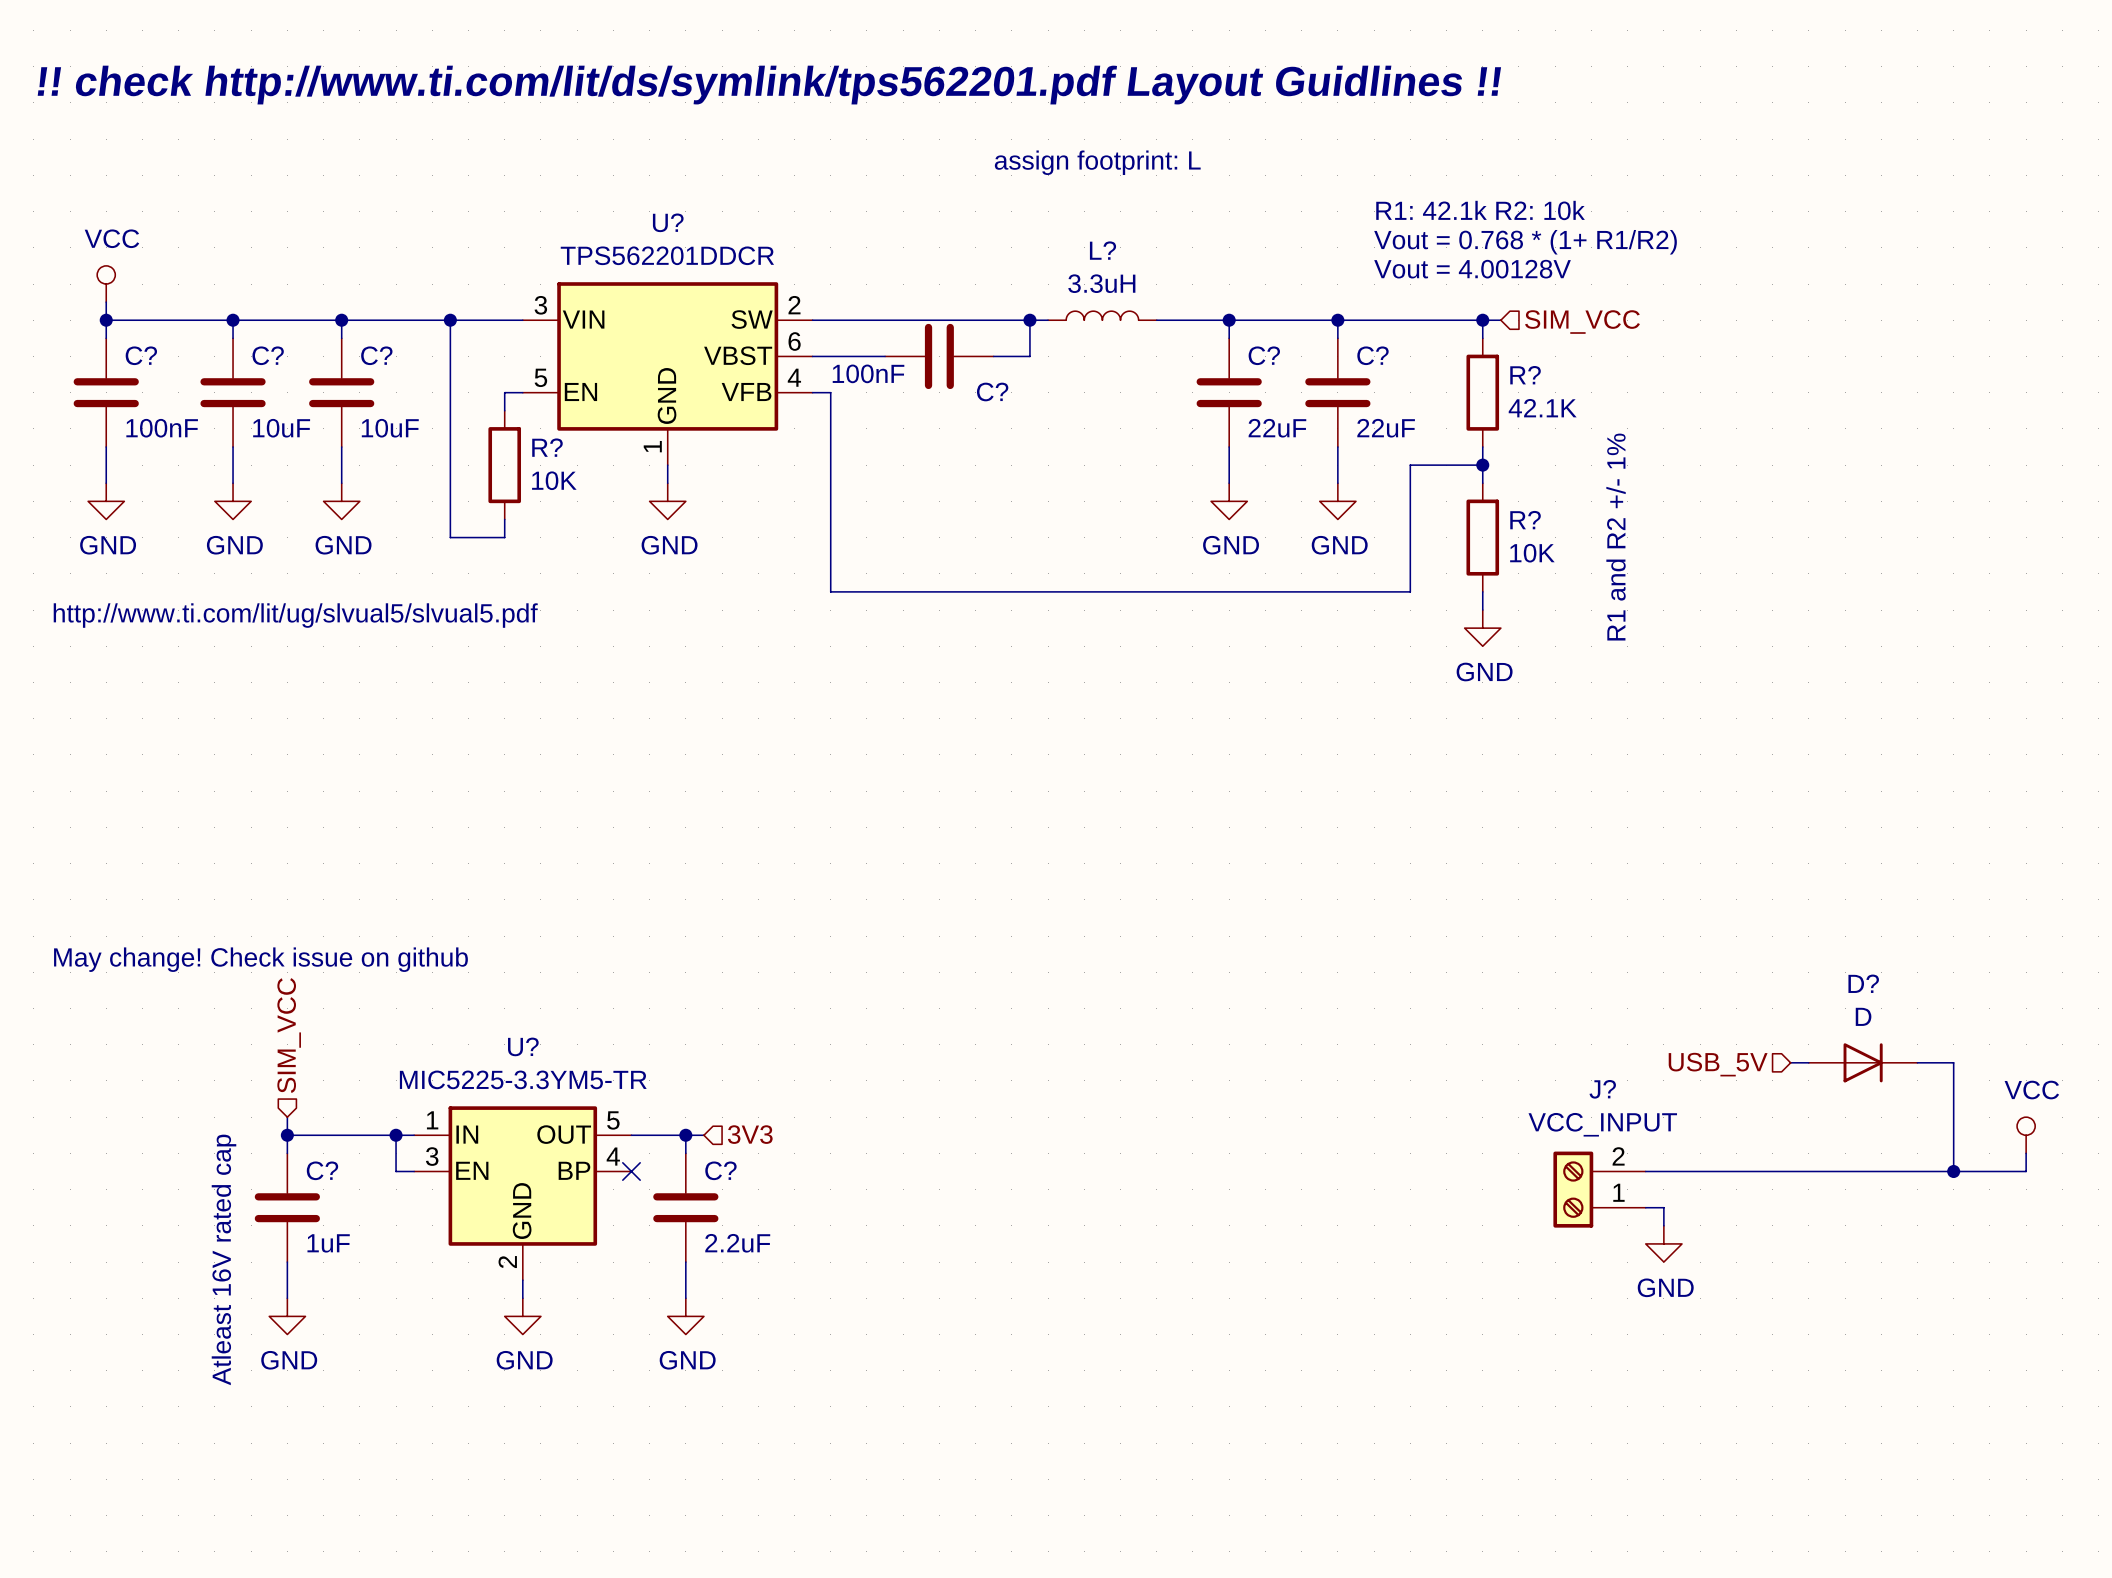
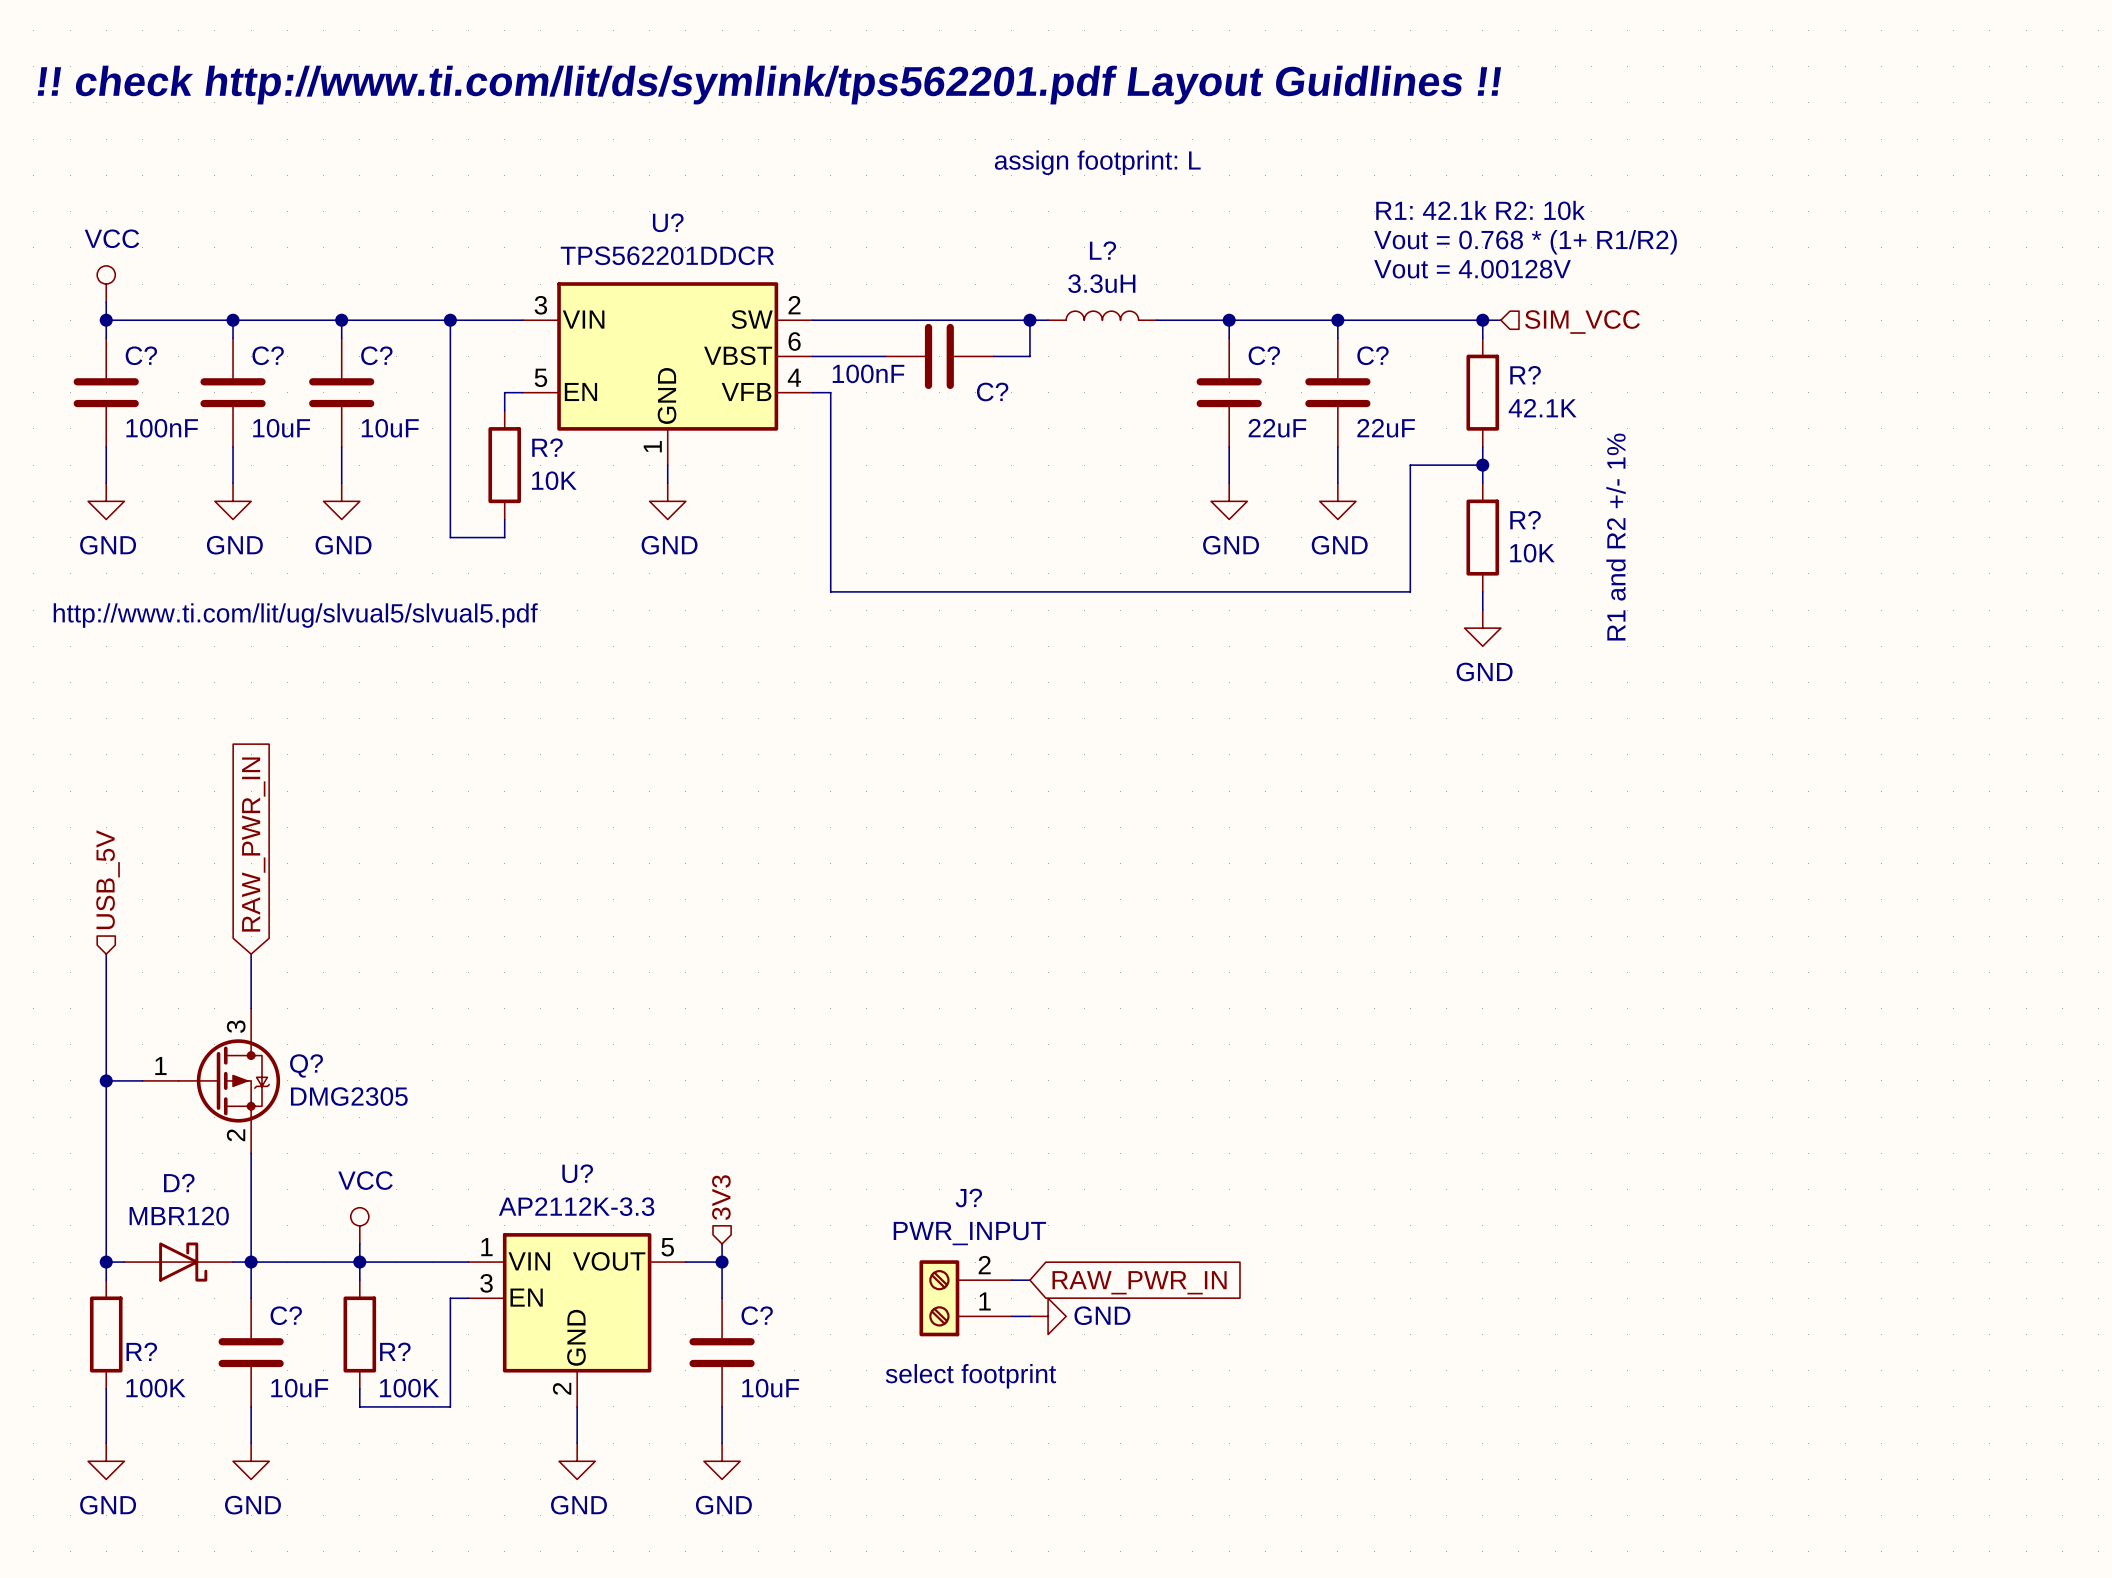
global label: none -> RAW_PWR_IN (253, 844)
hierarchical label: none -> USB_5V (108, 879)
wire: none -> (106, 954) (106, 1280)
wire: none -> (251, 954) (251, 1008)
text: May change! Check issue on github (260, 959) -> none
hierarchical label: SIM_VCC (289, 1035) -> none
wire: (1790, 1062) (1808, 1062) -> none
D?: D (1863, 1062) -> none
wire: (1917, 1062) (1953, 1062) (1953, 1171) -> none
hierarchical label: USB_5V (1718, 1064) -> none
wire: none -> (106, 1080) (142, 1080)
junction: none -> (106, 1080)
Q?: none -> DMG2305 (211, 1080)
wire: (287, 1117) (287, 1153) -> (251, 1406) (251, 1443)
hierarchical label rotation: 0° (750, 1134) -> 90° counterclockwise (721, 1197)
hierarchical label position: 3V3 (750, 1134) -> 3V3 (721, 1197)
wire: (287, 1135) (414, 1135) -> none
junction: (287, 1135) -> none
wire: (396, 1135) (396, 1171) (414, 1171) -> none
junction: (396, 1135) -> none
wire: (631, 1135) (703, 1135) -> none
wire: (685, 1135) (685, 1153) -> none
junction: (685, 1135) -> none
power symbol: VCC (2026, 1135) -> none
wire: none -> (251, 1153) (251, 1298)
wire: (2026, 1153) (2026, 1171) (1645, 1171) -> none
no-connect mark: (631, 1171) -> none
junction: (1953, 1171) -> none
J?: VCC_INPUT (1599, 1189) -> none
U?: MIC5225-3.3YM5-TR (522, 1193) -> none
C?: 1uF (287, 1207) -> none
C?: 2.2uF (685, 1207) -> none
wire: (1645, 1207) (1663, 1207) (1663, 1225) -> none
power symbol: none -> VCC (359, 1225)
wire: none -> (722, 1243) (722, 1298)
power symbol: GND (1663, 1243) -> none
text: Atleast 16V rated cap (224, 1259) -> none
wire: none -> (106, 1262) (124, 1262)
junction: none -> (106, 1262)
D?: none -> MBR120 (178, 1262)
wire: none -> (233, 1262) (468, 1262)
junction: none -> (251, 1262)
wire: (287, 1262) (287, 1298) -> (359, 1243) (359, 1280)
junction: none -> (359, 1262)
wire: (685, 1262) (685, 1298) -> (685, 1262) (722, 1262)
junction: none -> (722, 1262)
wire: none -> (1011, 1280) (1029, 1280)
global label: none -> RAW_PWR_IN (1139, 1282)
wire: none -> (468, 1298) (450, 1298) (450, 1406) (359, 1406) (359, 1388)
J?: none -> PWR_INPUT (965, 1298)
power symbol: GND (287, 1316) -> none
power symbol: GND (522, 1316) -> none
power symbol: GND (685, 1316) -> none
wire: none -> (1011, 1316) (1029, 1316)
power symbol: none -> GND (1048, 1316)
U?: none -> AP2112K-3.3 (577, 1320)
R?: none -> 100K (106, 1334)
R?: none -> 100K (359, 1334)
C?: none -> 10uF (251, 1352)
C?: none -> 10uF (722, 1352)
text: none -> select footprint (970, 1376)
wire: none -> (106, 1388) (106, 1443)
wire: none -> (577, 1406) (577, 1443)
wire: none -> (722, 1406) (722, 1443)
power symbol: none -> GND (106, 1461)
power symbol: none -> GND (251, 1461)
power symbol: none -> GND (577, 1461)
power symbol: none -> GND (722, 1461)

